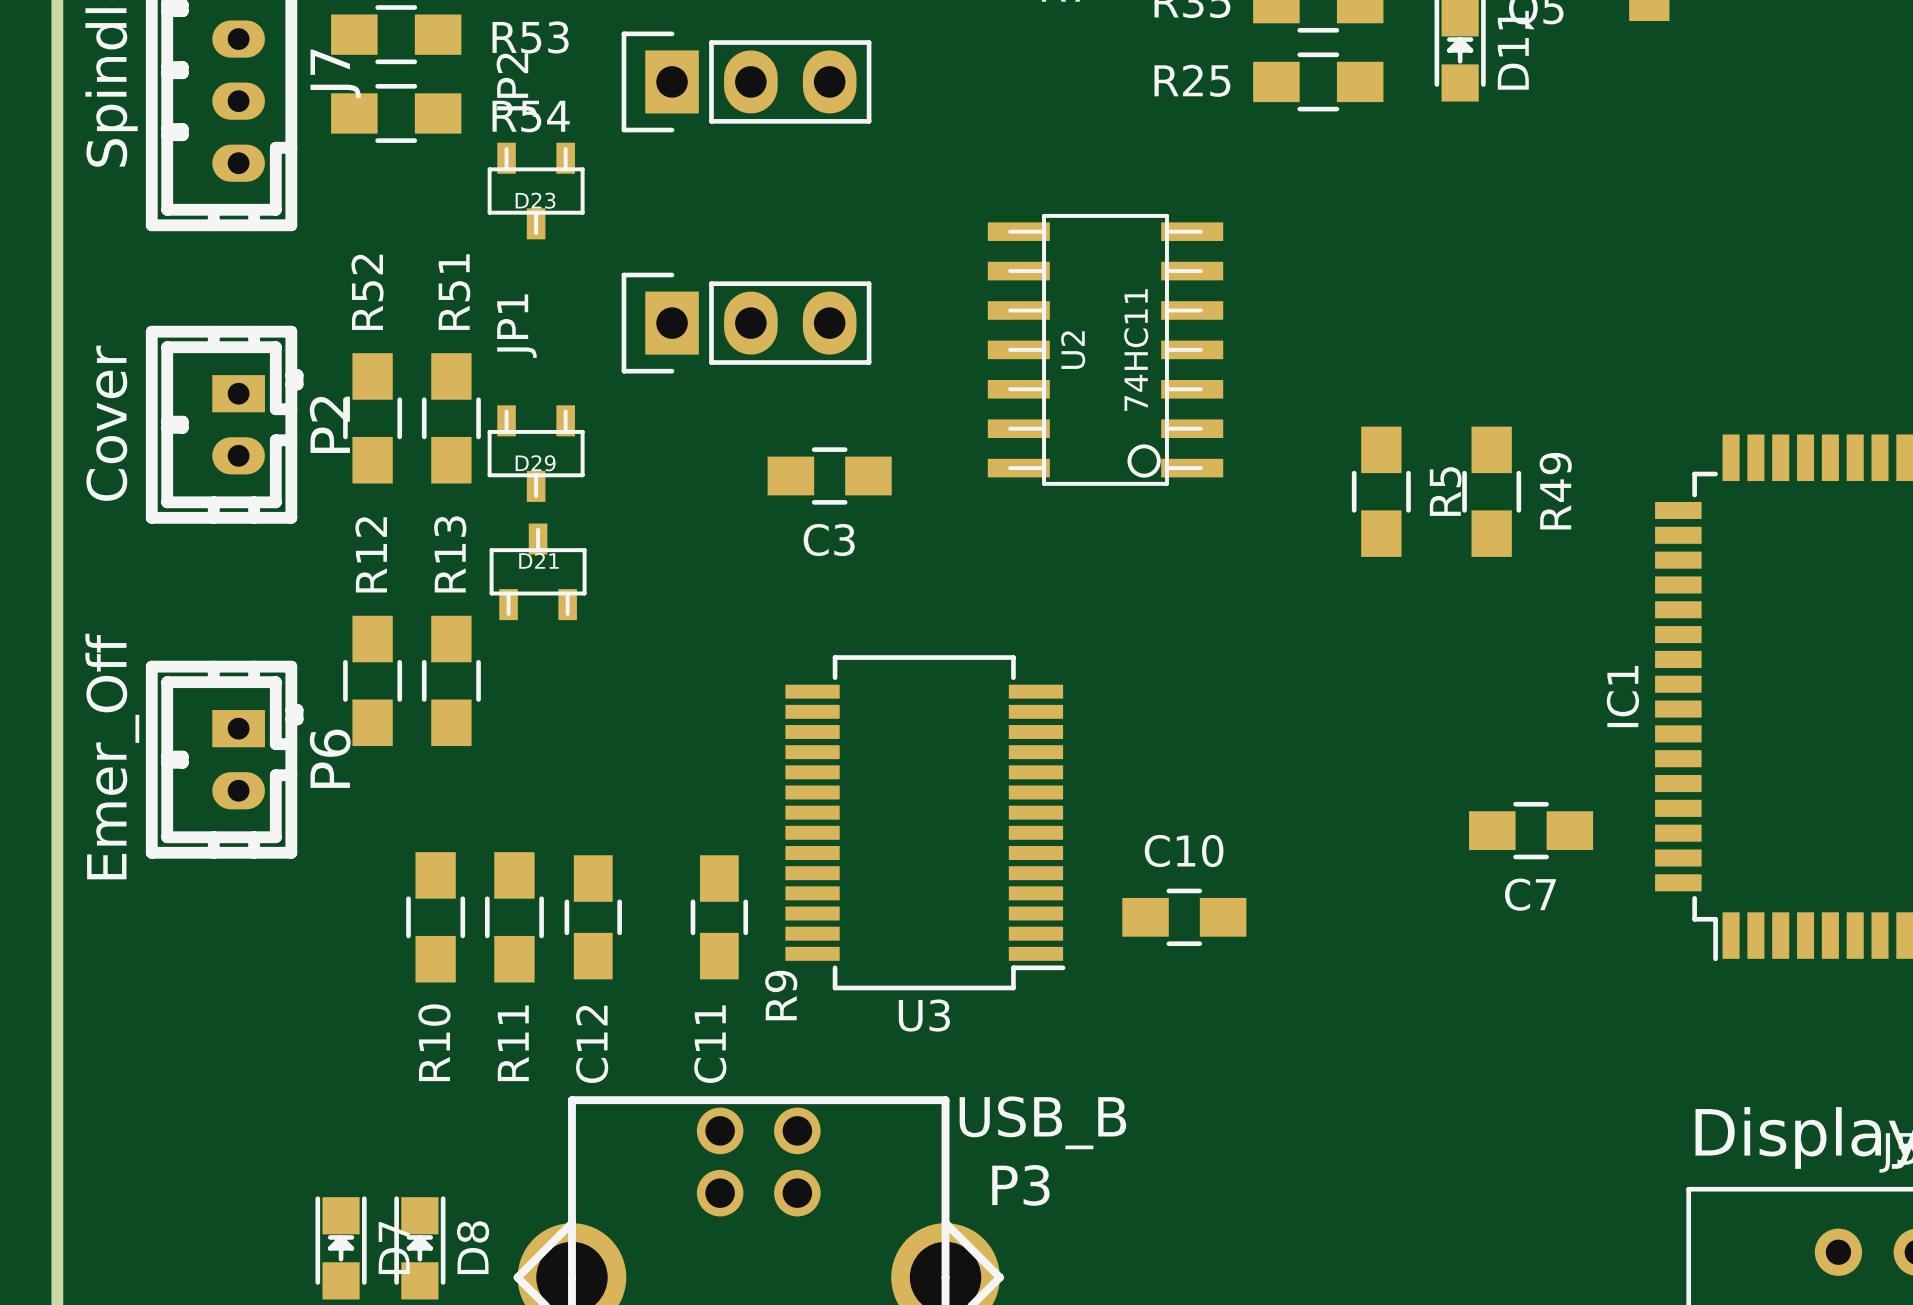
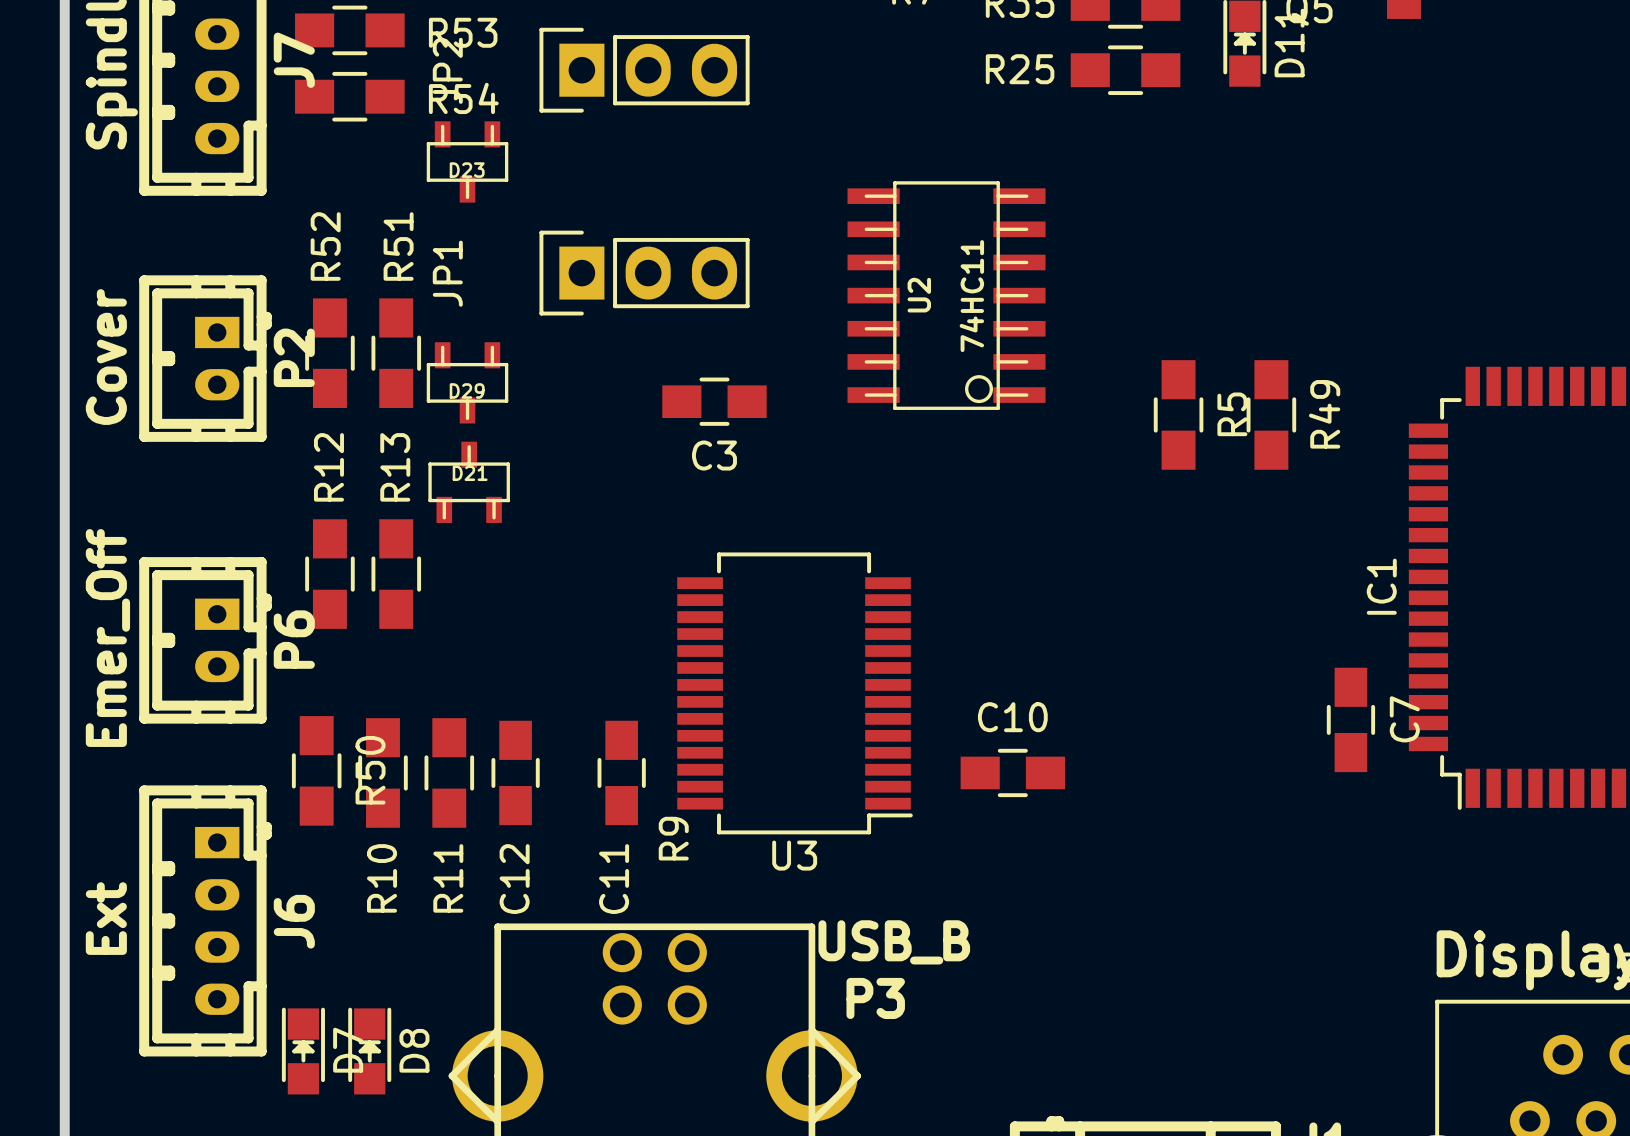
C7 rotation: 0° (1531, 830) -> 90° clockwise (1350, 719)
C7 name position: C7 (1530, 894) -> C7 (1404, 719)
R50: none -> (316, 770)
J6: none -> Ext (205, 920)

